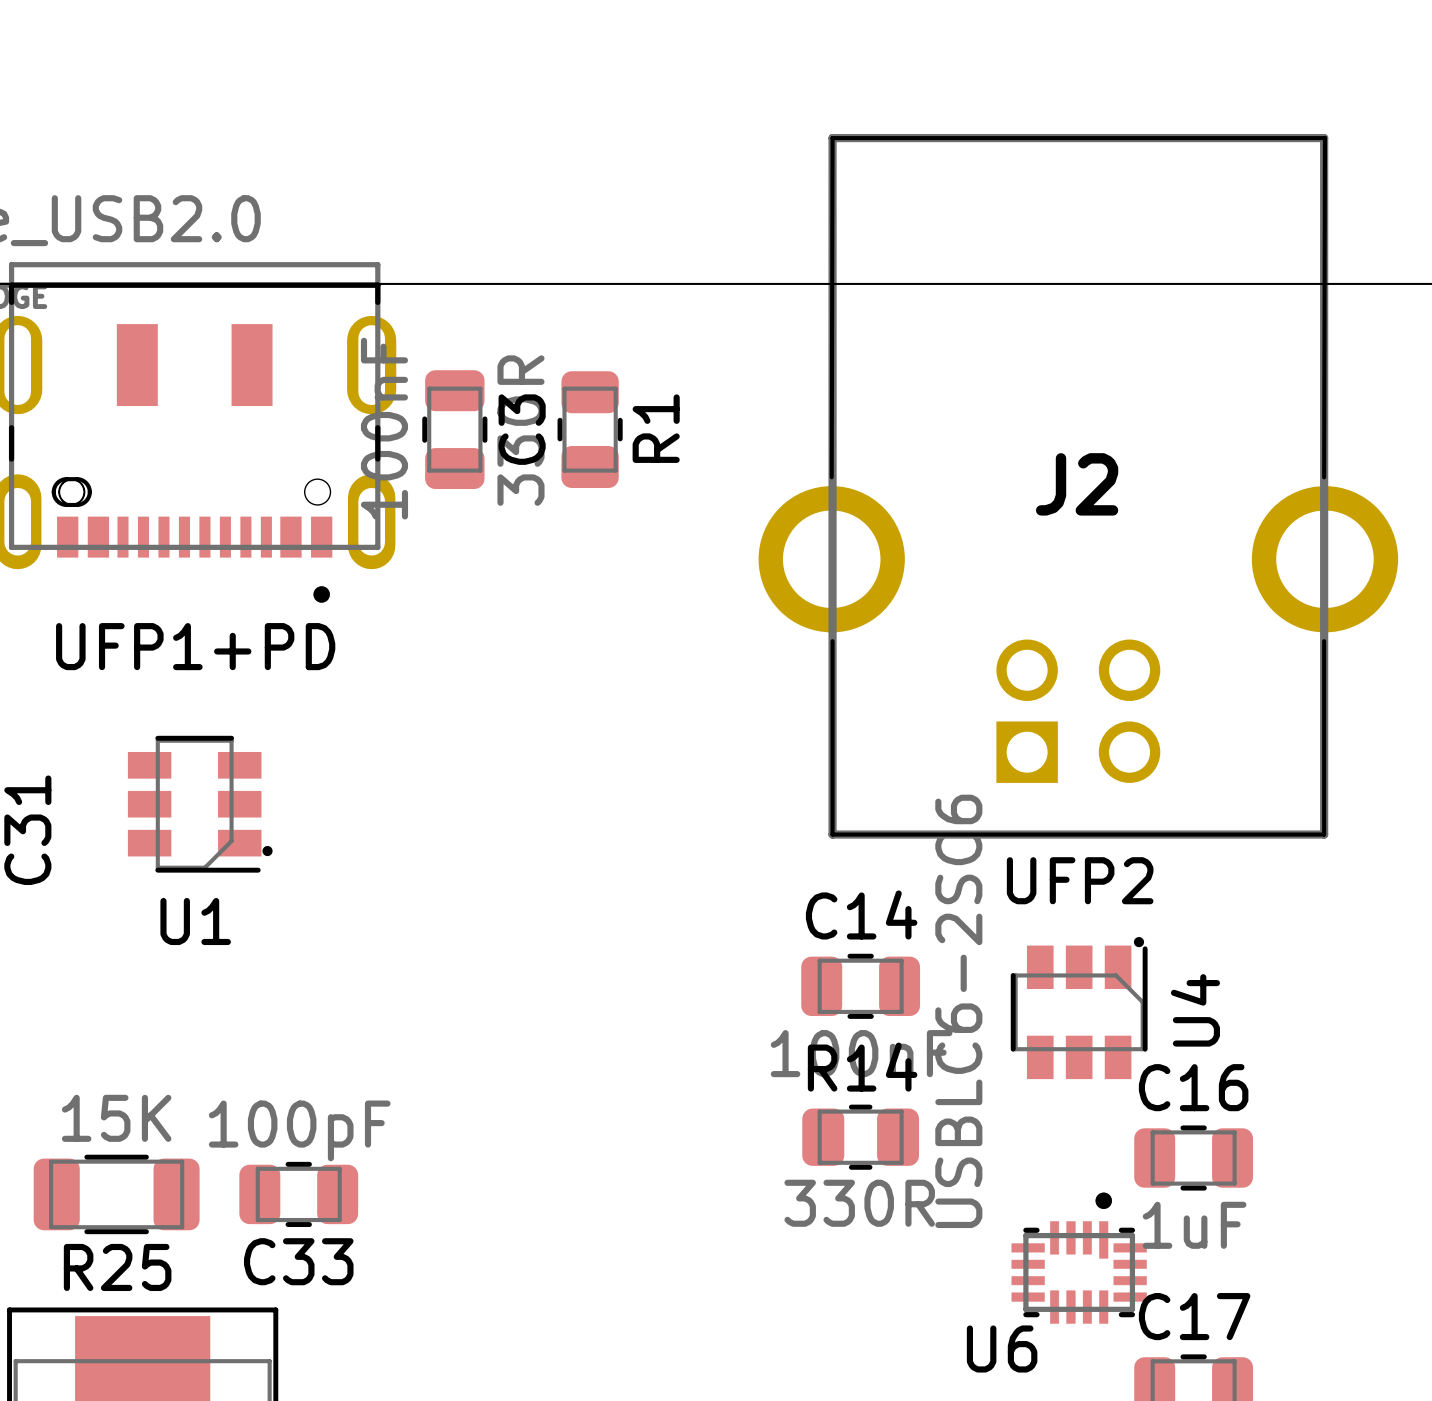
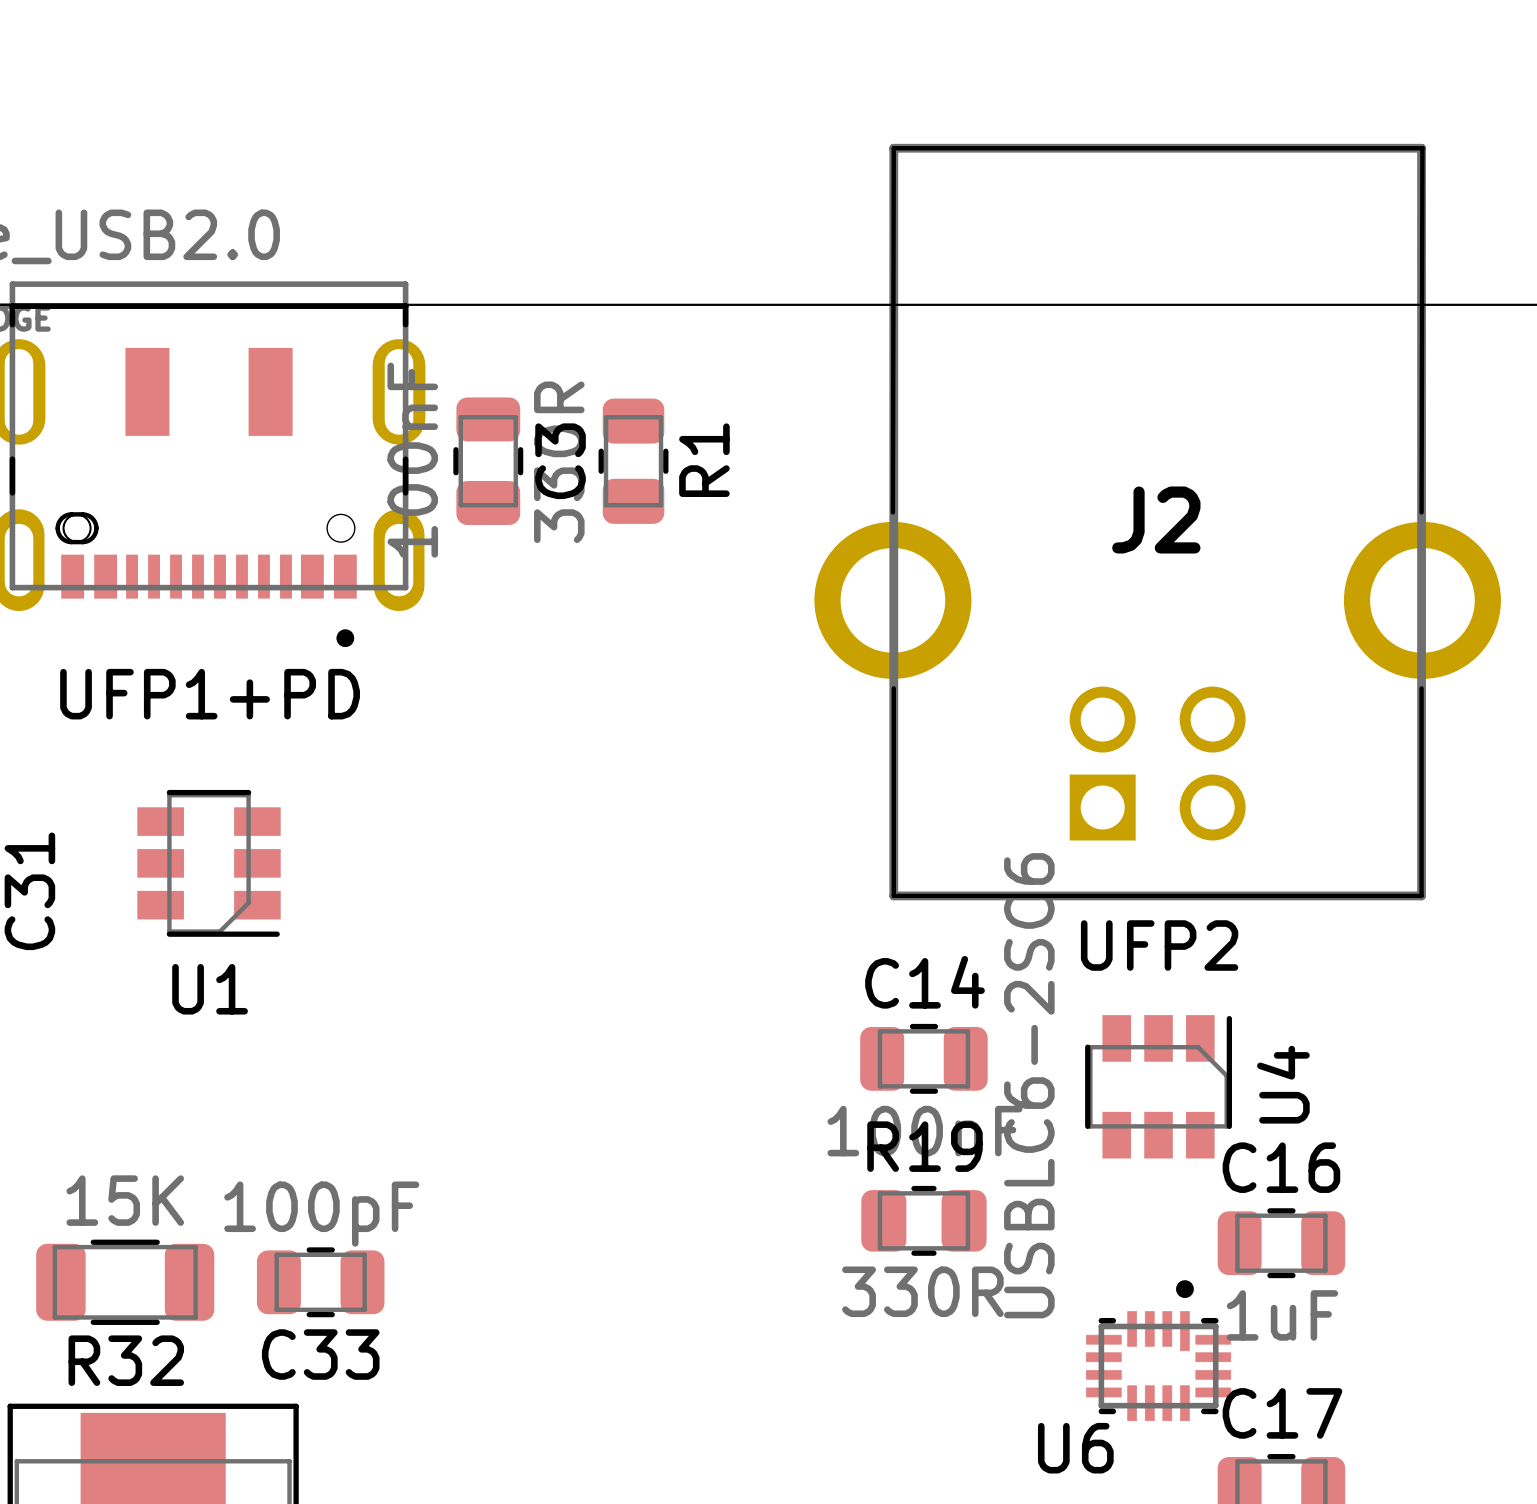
drawing: [262, 845, 273, 857] -> none
drawing: [1133, 937, 1145, 948] -> none
R14 name: R14 (862, 1067) -> R19 (925, 1146)
R25 name: R25 (117, 1267) -> R32 (126, 1360)

